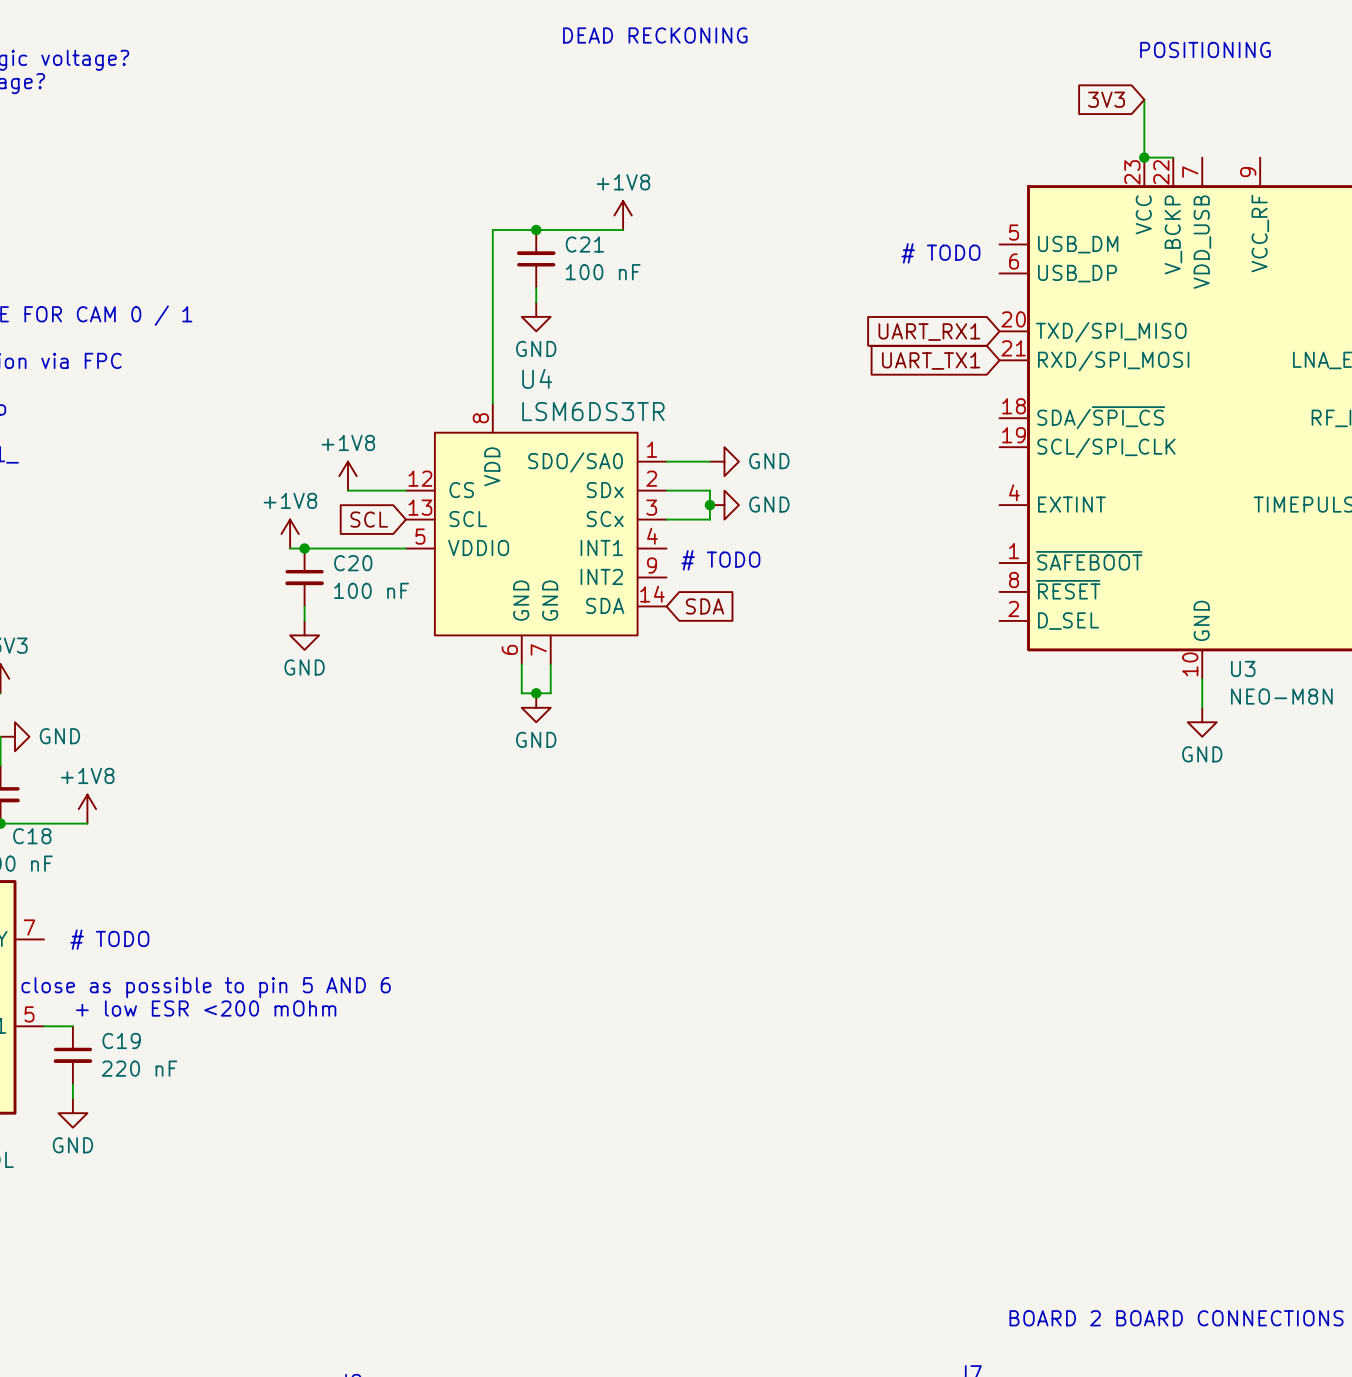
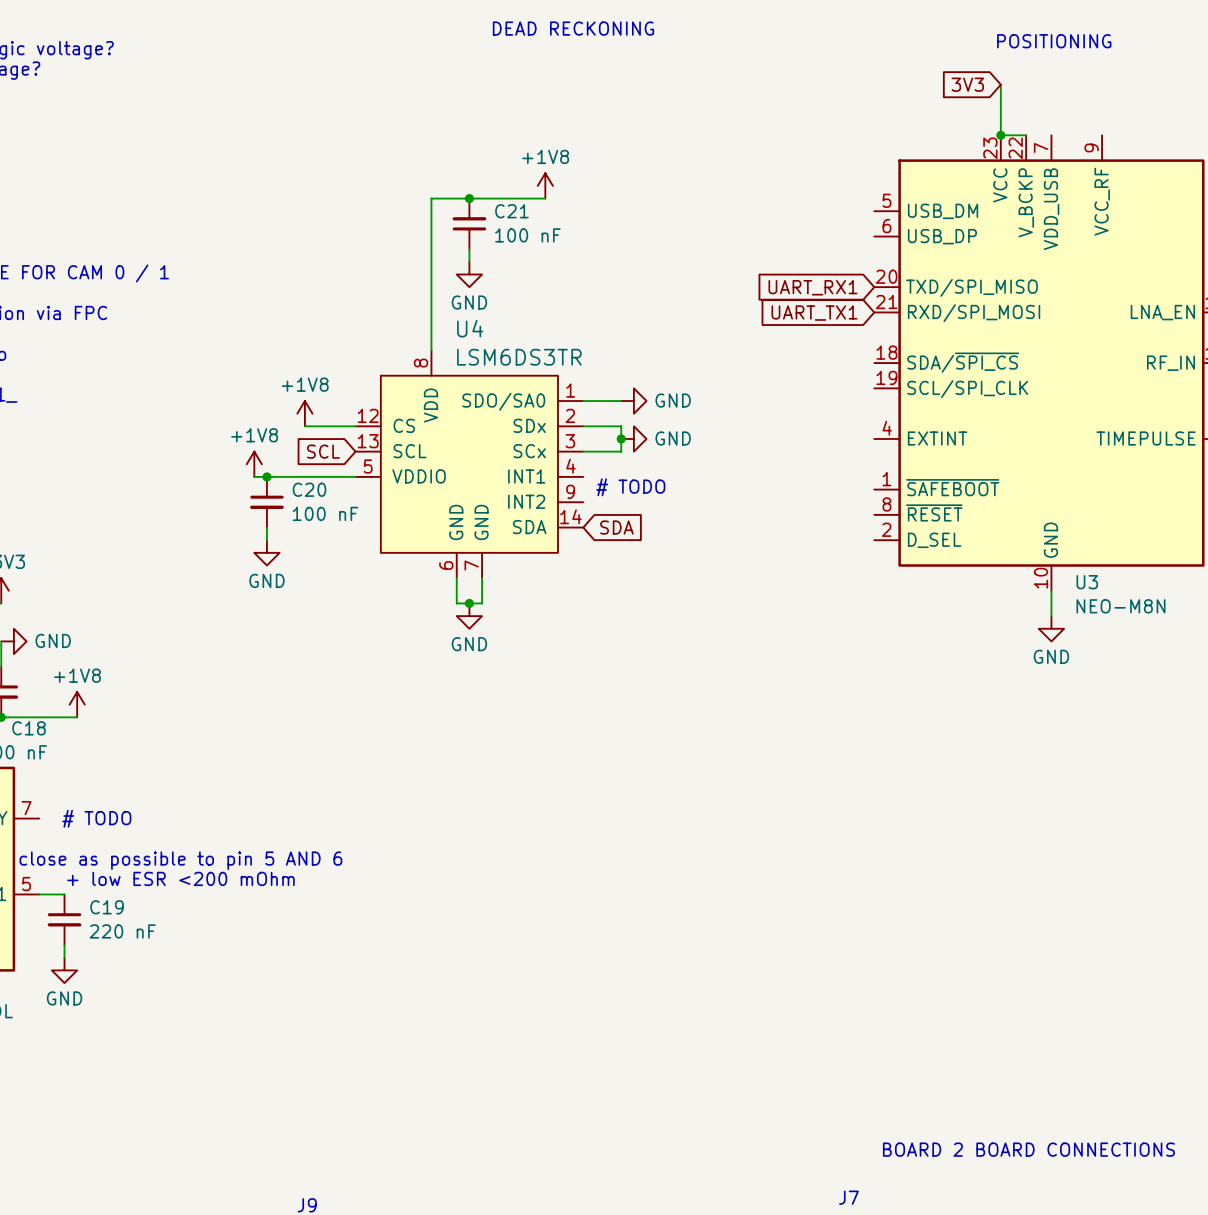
text: # TODO (940, 253) -> none

